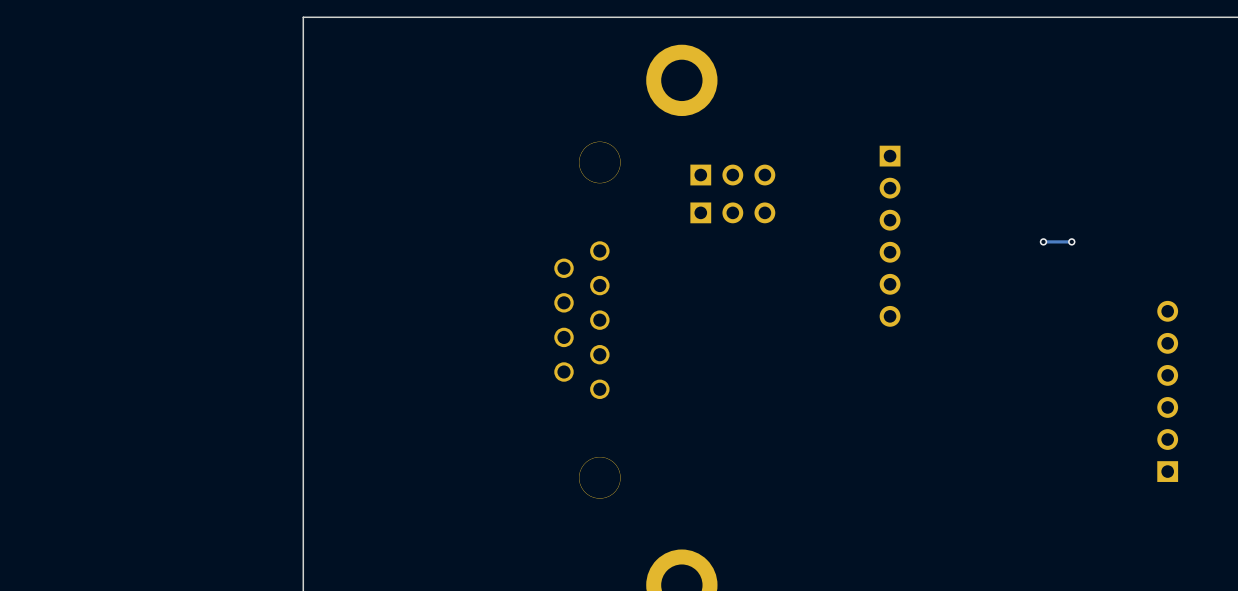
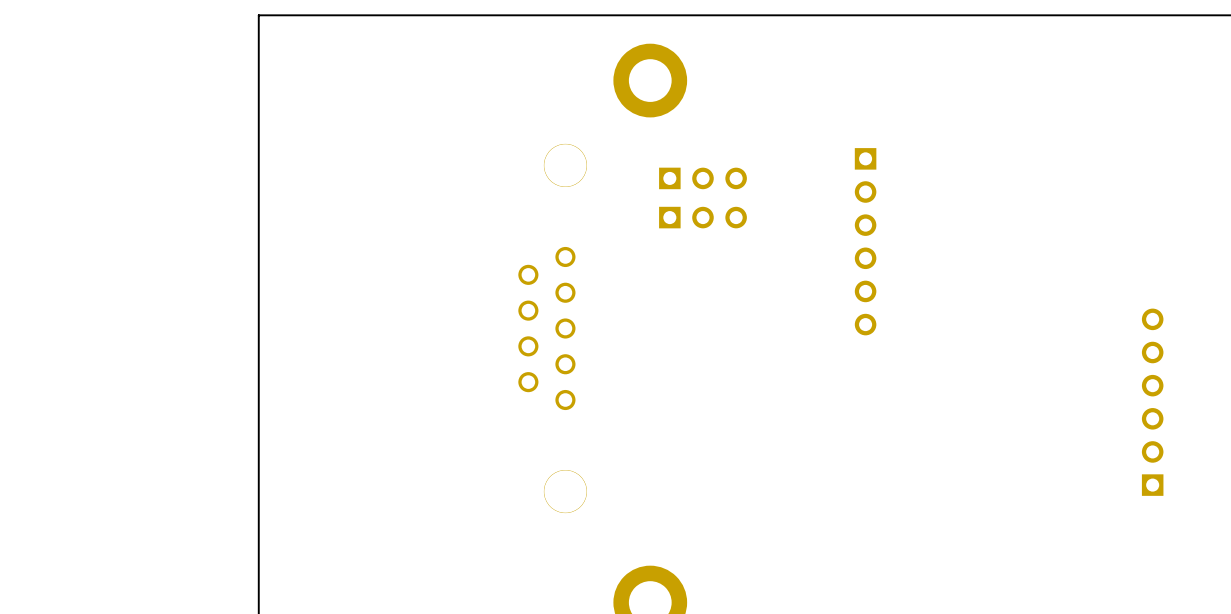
via: (1043, 241) -> none
track: (1071, 241) (1043, 241) -> none
via: (1071, 241) -> none

